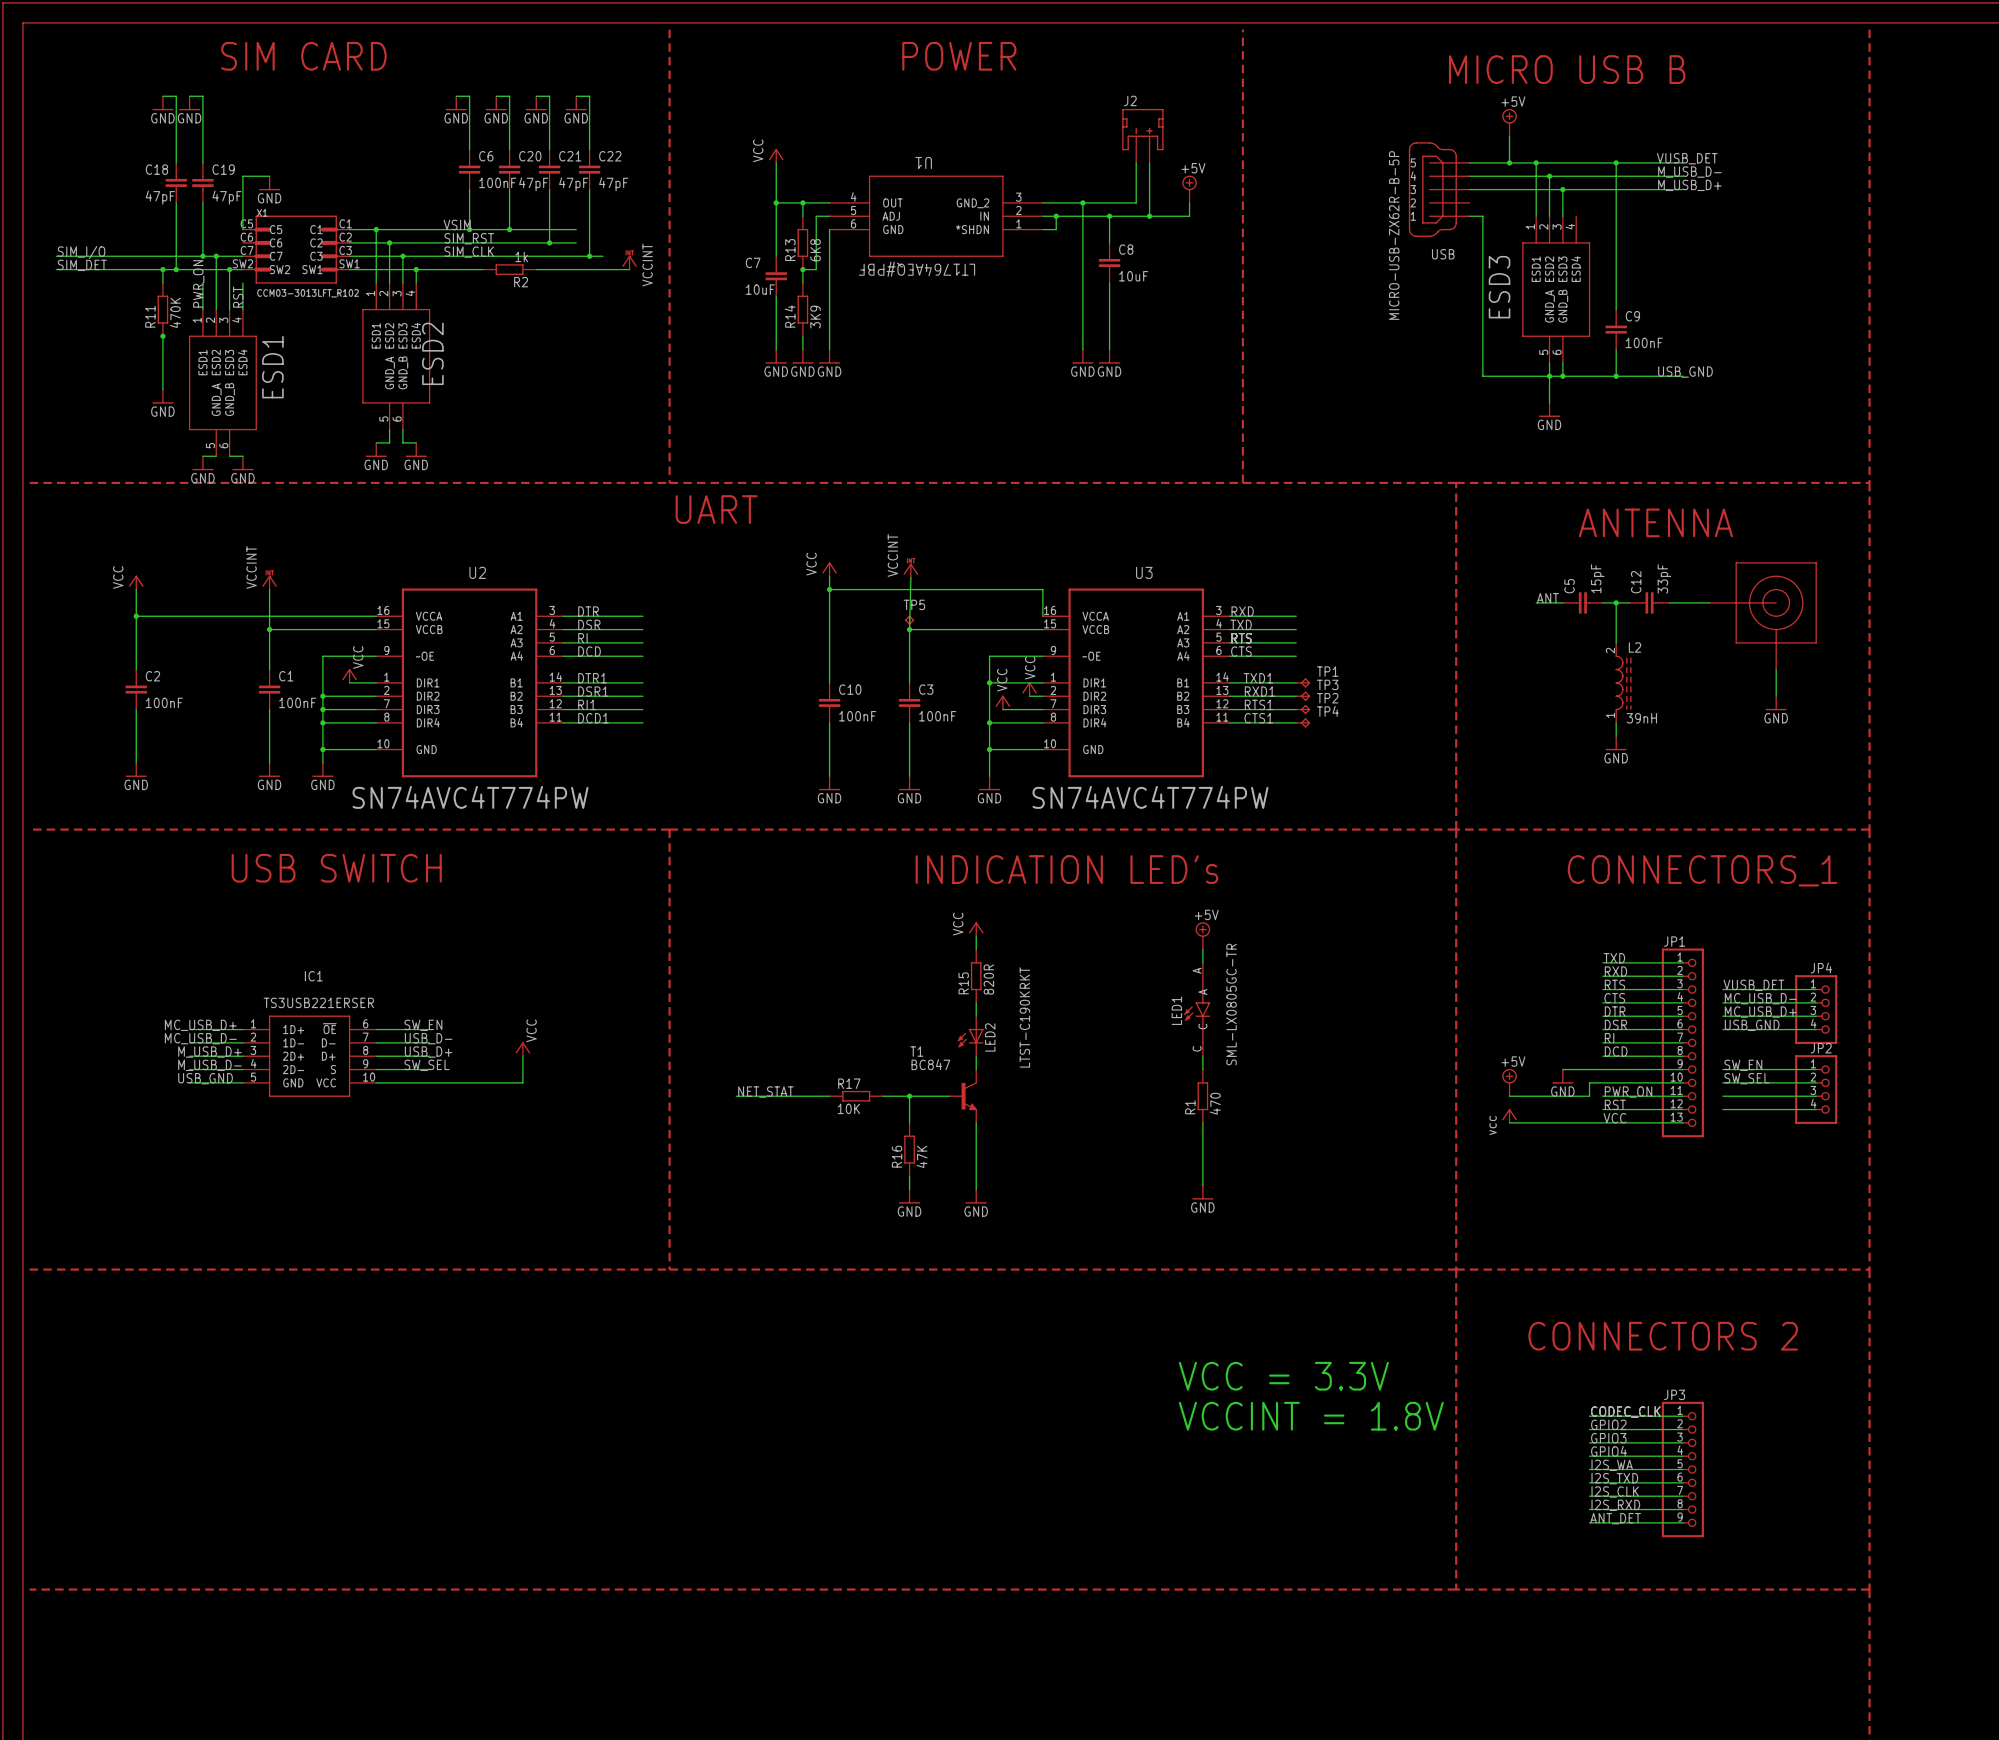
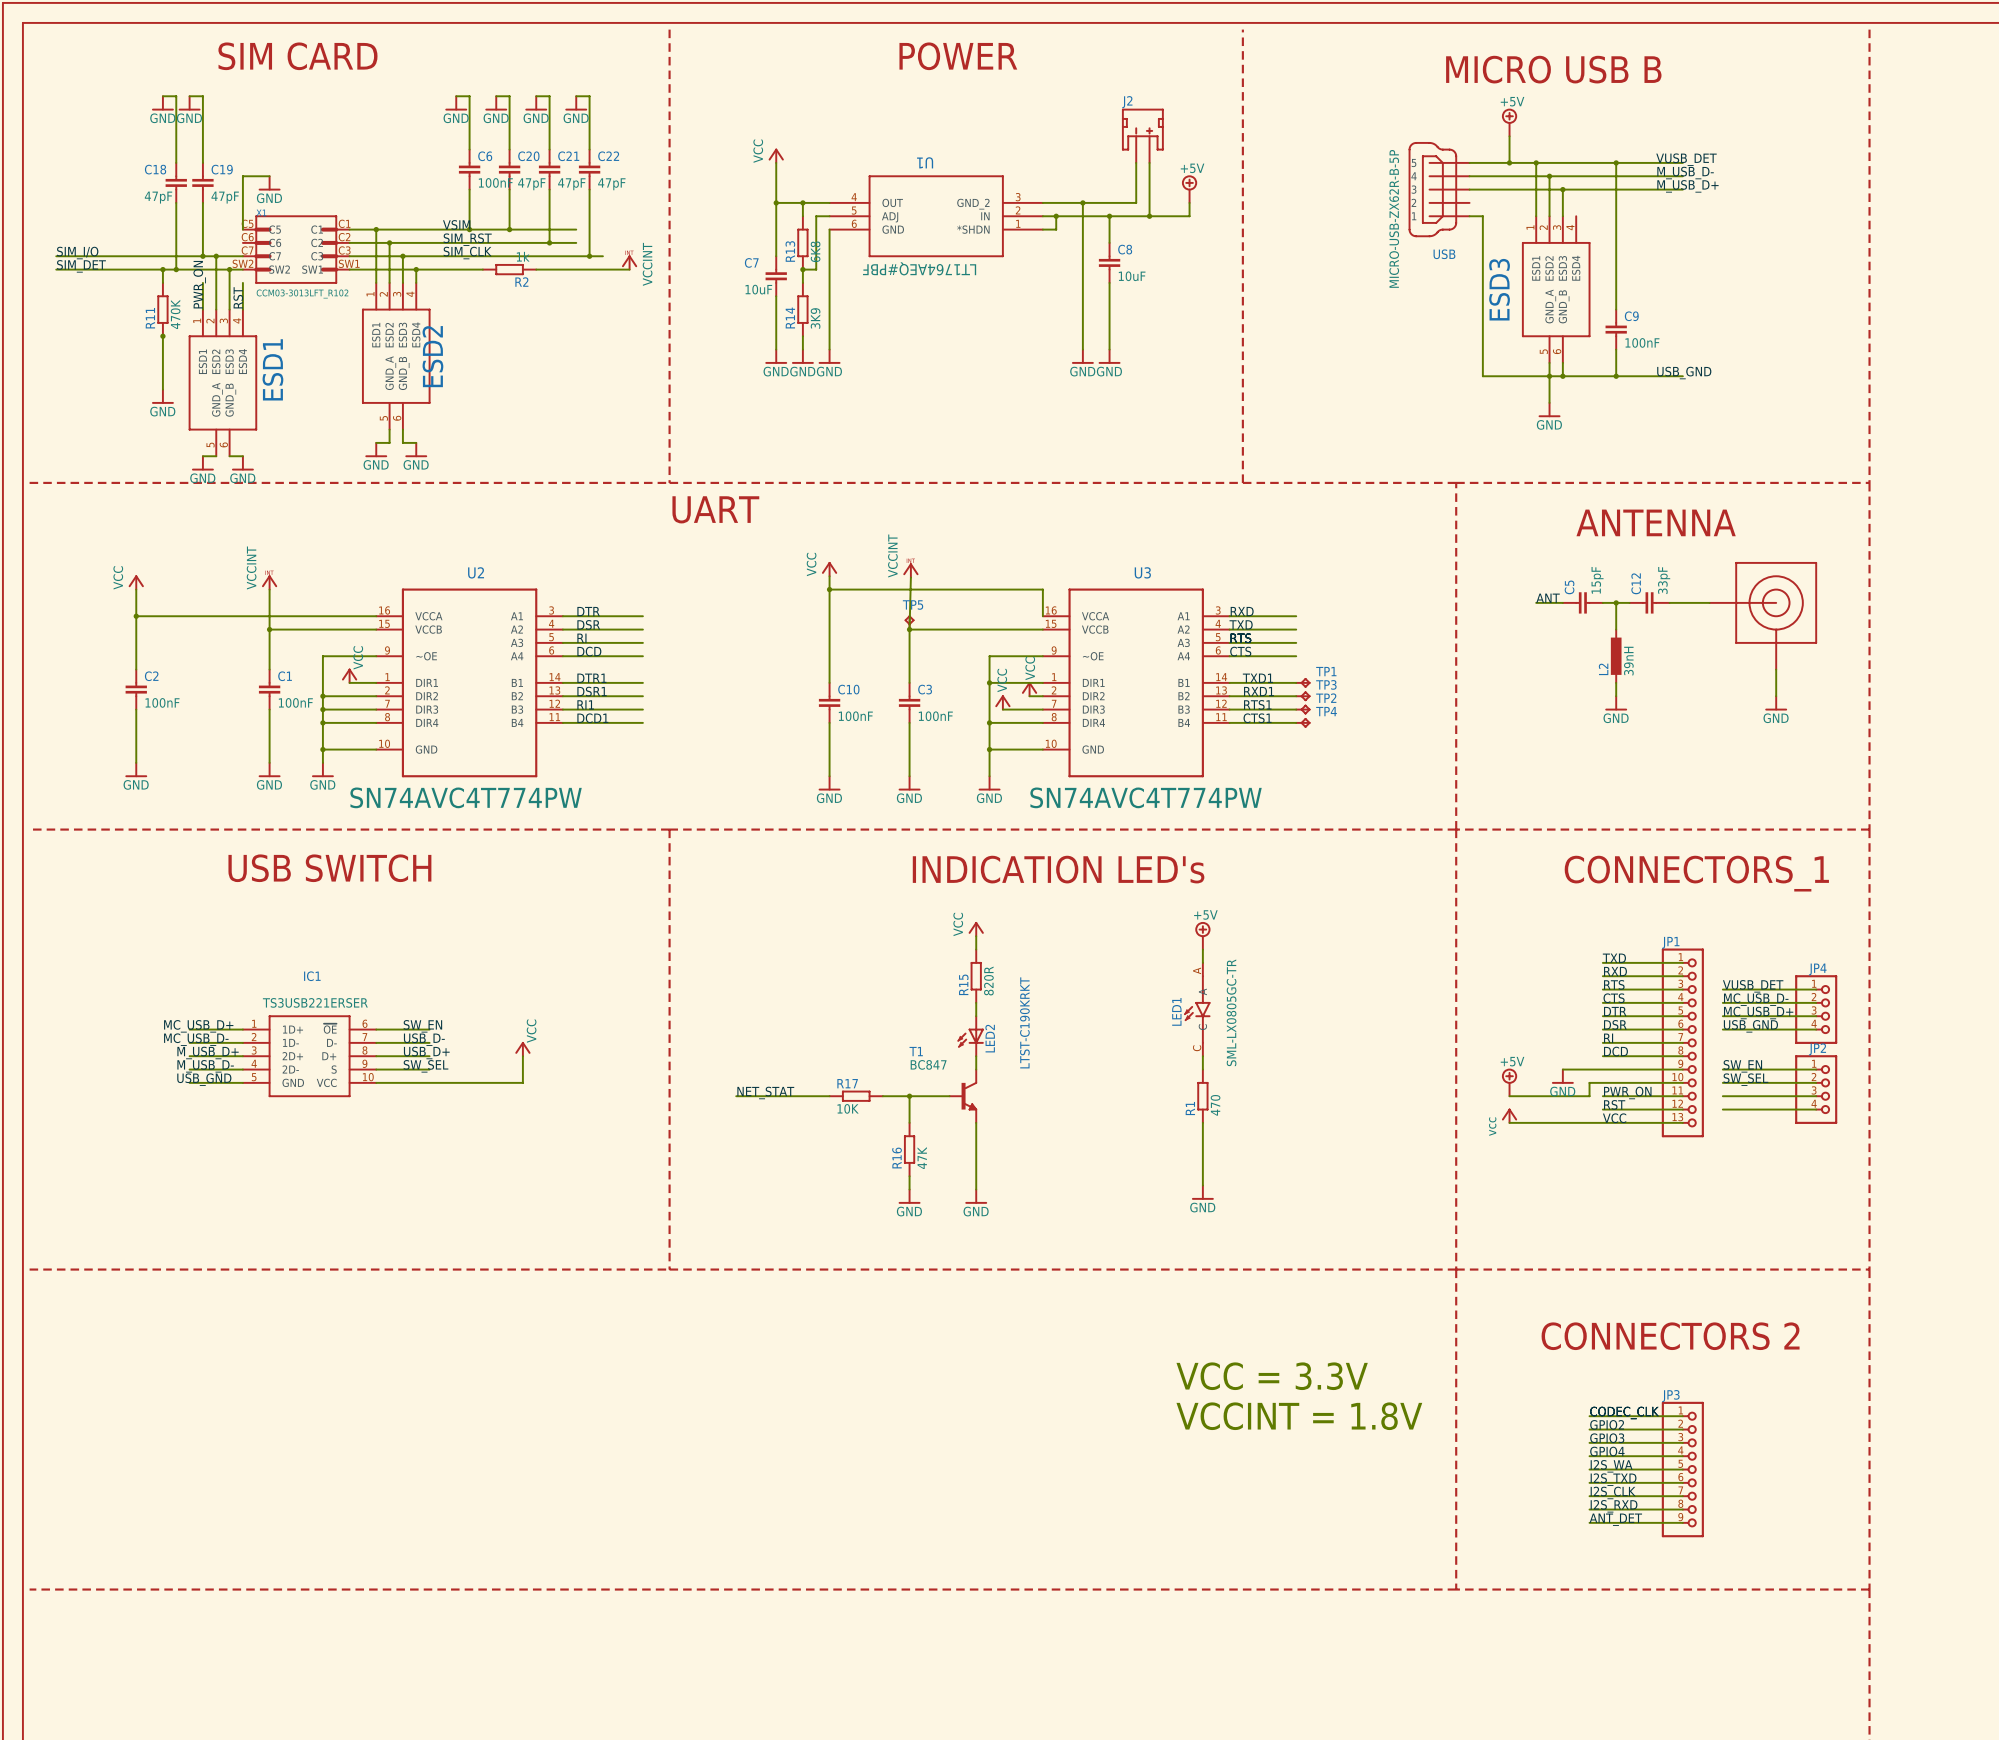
L2 symbol: [1615, 642, 1632, 723] -> [1610, 629, 1622, 683]
L2 name position: L2 (1634, 647) -> L2 (1603, 669)
L2 value position: 39nH (1641, 718) -> 39nH (1628, 661)
wire: (1616, 722) (1616, 736) -> (1616, 682) (1616, 696)
power symbol position: GND (1616, 743) -> GND (1616, 703)

